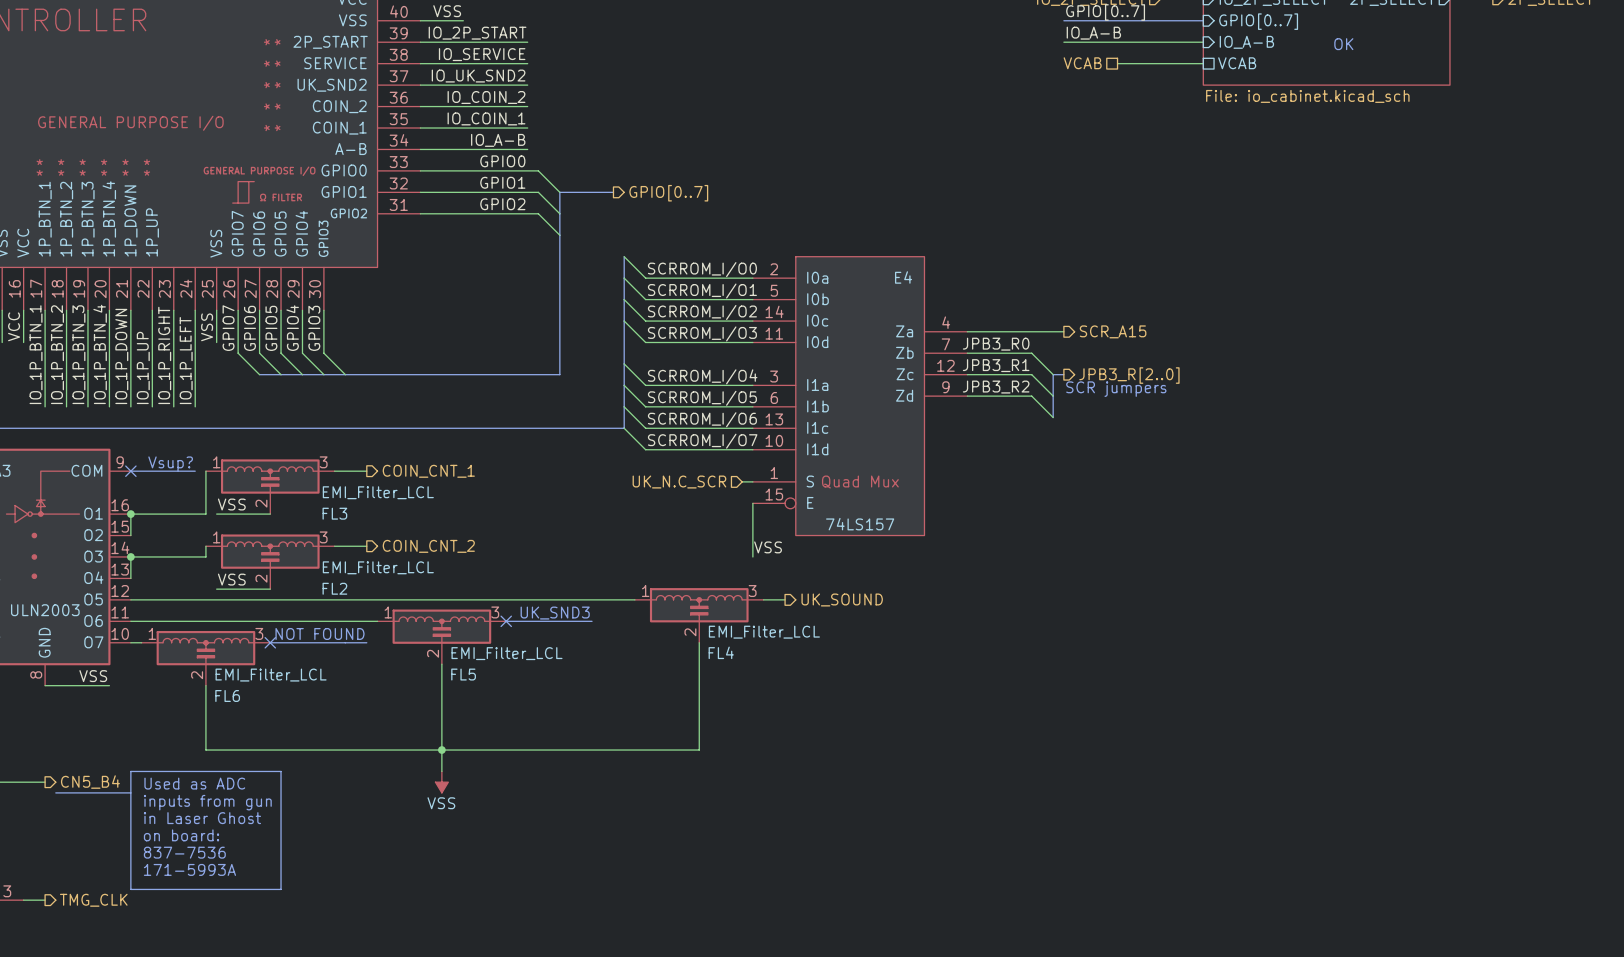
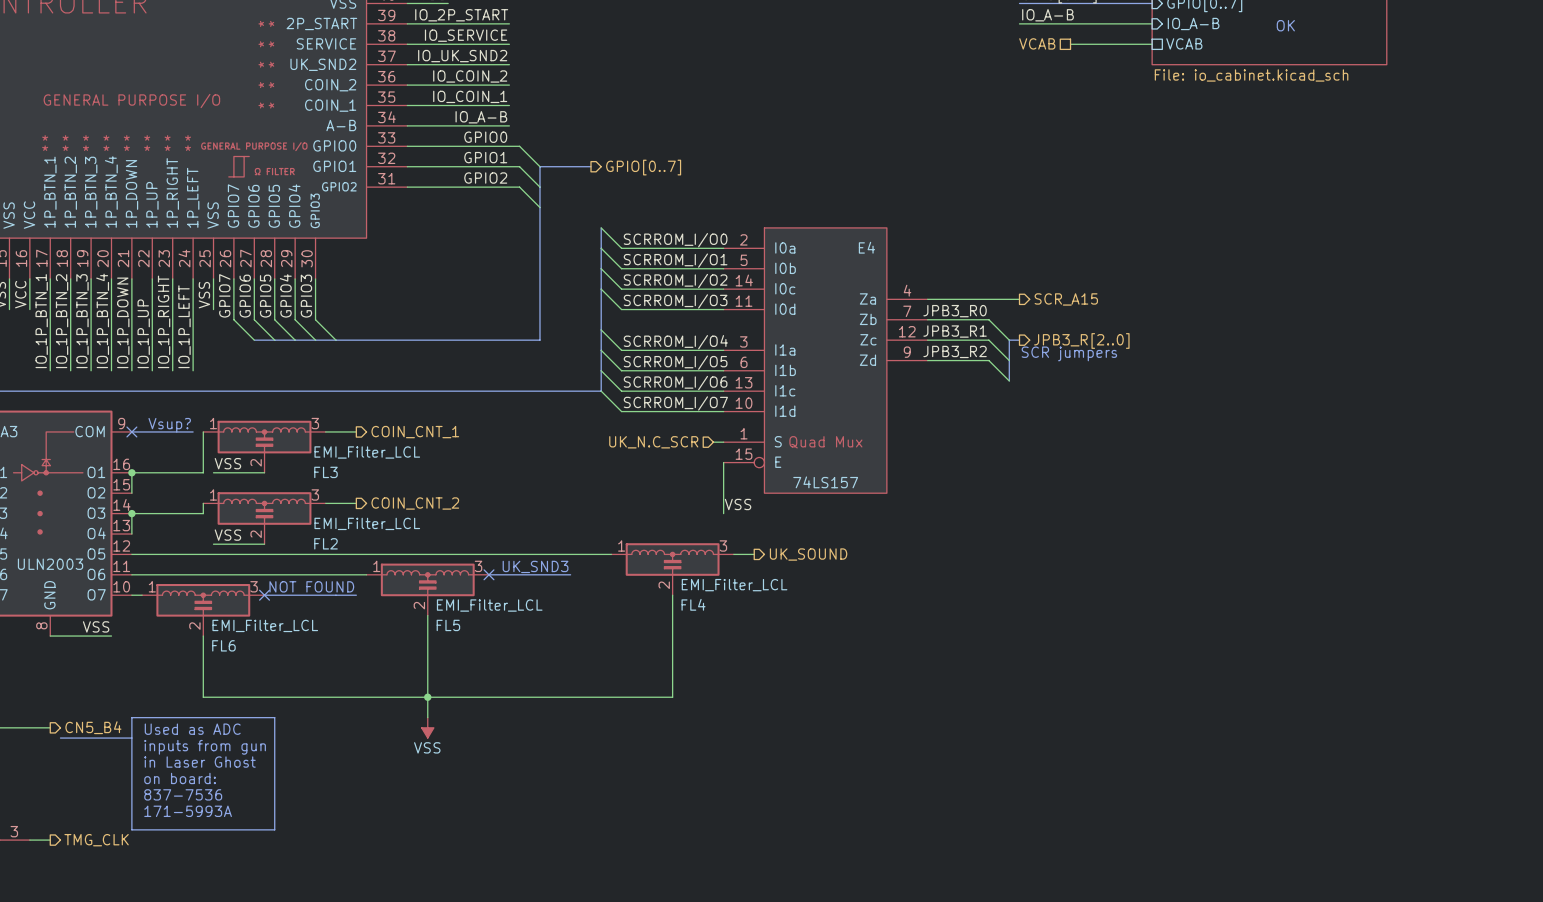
part text: none -> * (167, 137)
part text: none -> * (188, 137)
part text: none -> * (167, 148)
part text: none -> * (188, 148)
part pin name: none -> 1P_RIGHT (172, 192)
part pin name: none -> 1P_LEFT (193, 197)

